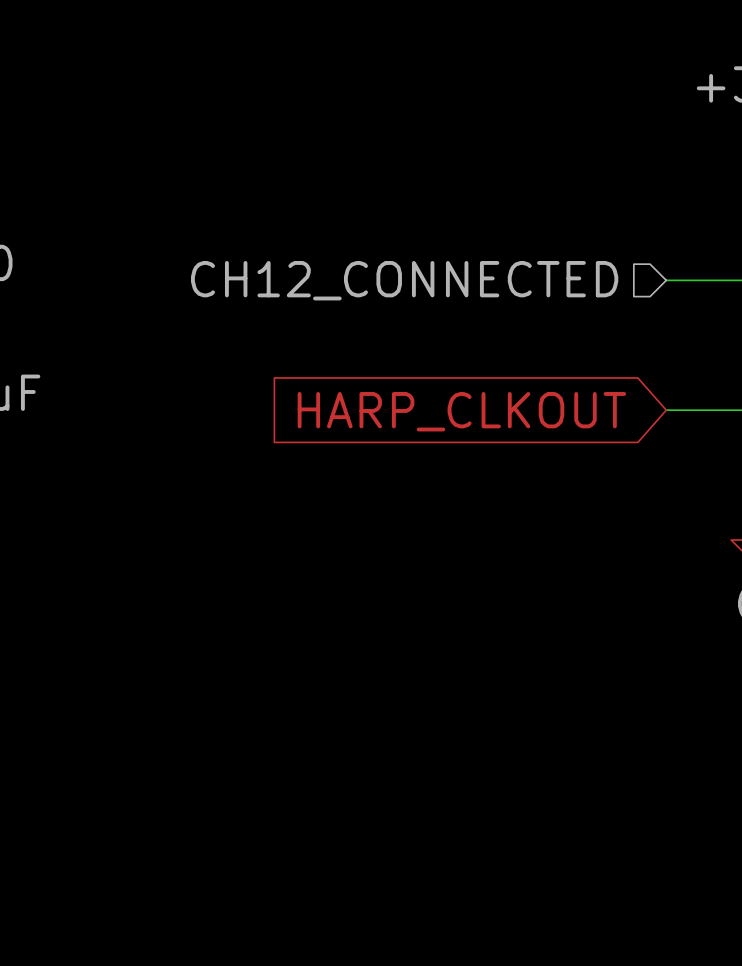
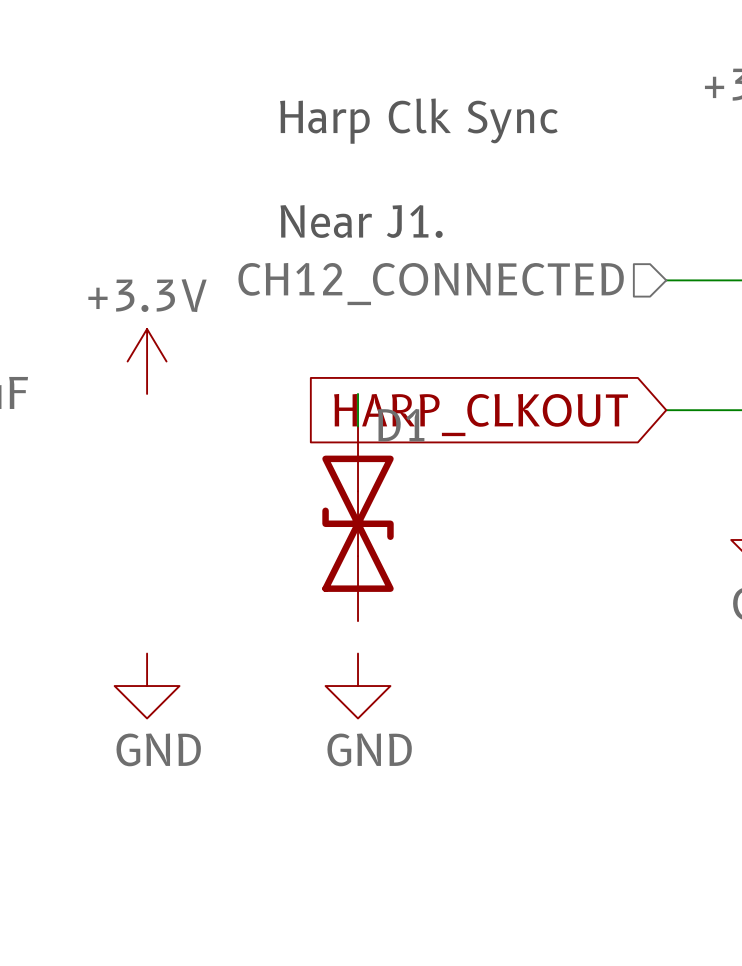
text: none -> Harp Clk Sync (418, 121)
text: none -> Near J1. (361, 221)
power symbol: none -> +3.3V (147, 361)
wire: none -> (358, 393) (358, 426)
D1: none -> (358, 523)
power symbol: none -> GND (147, 686)
power symbol: none -> GND (358, 686)

